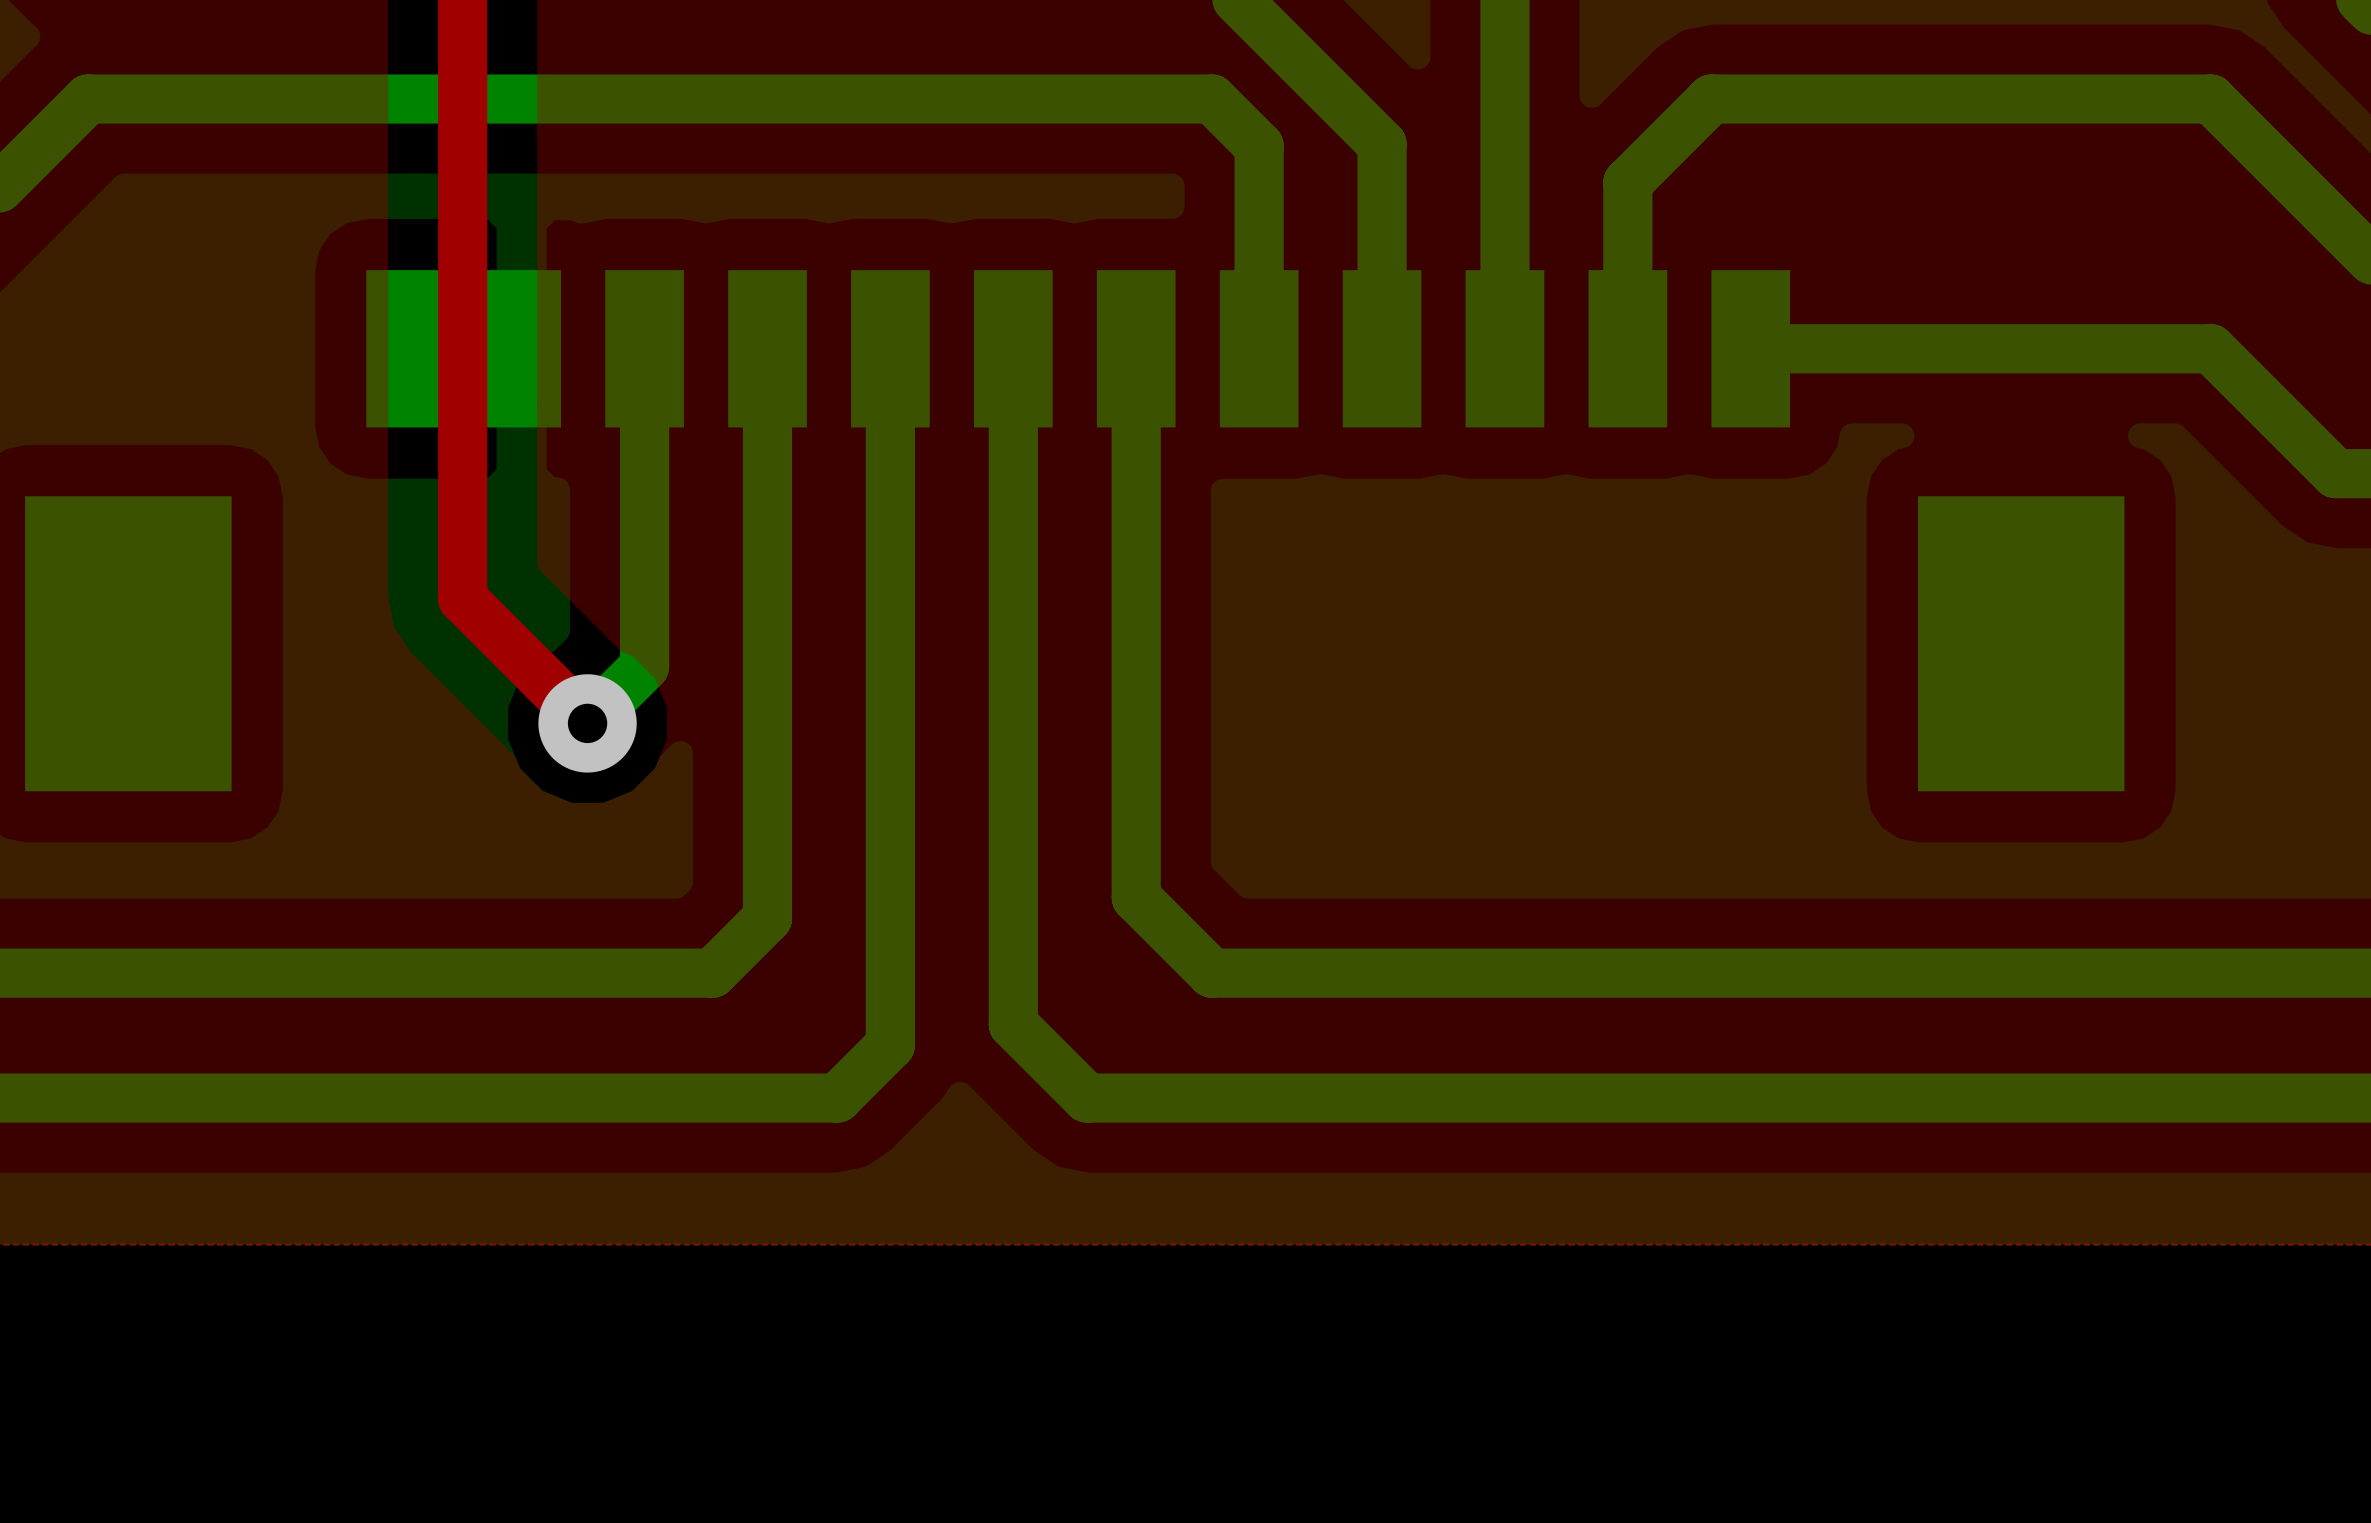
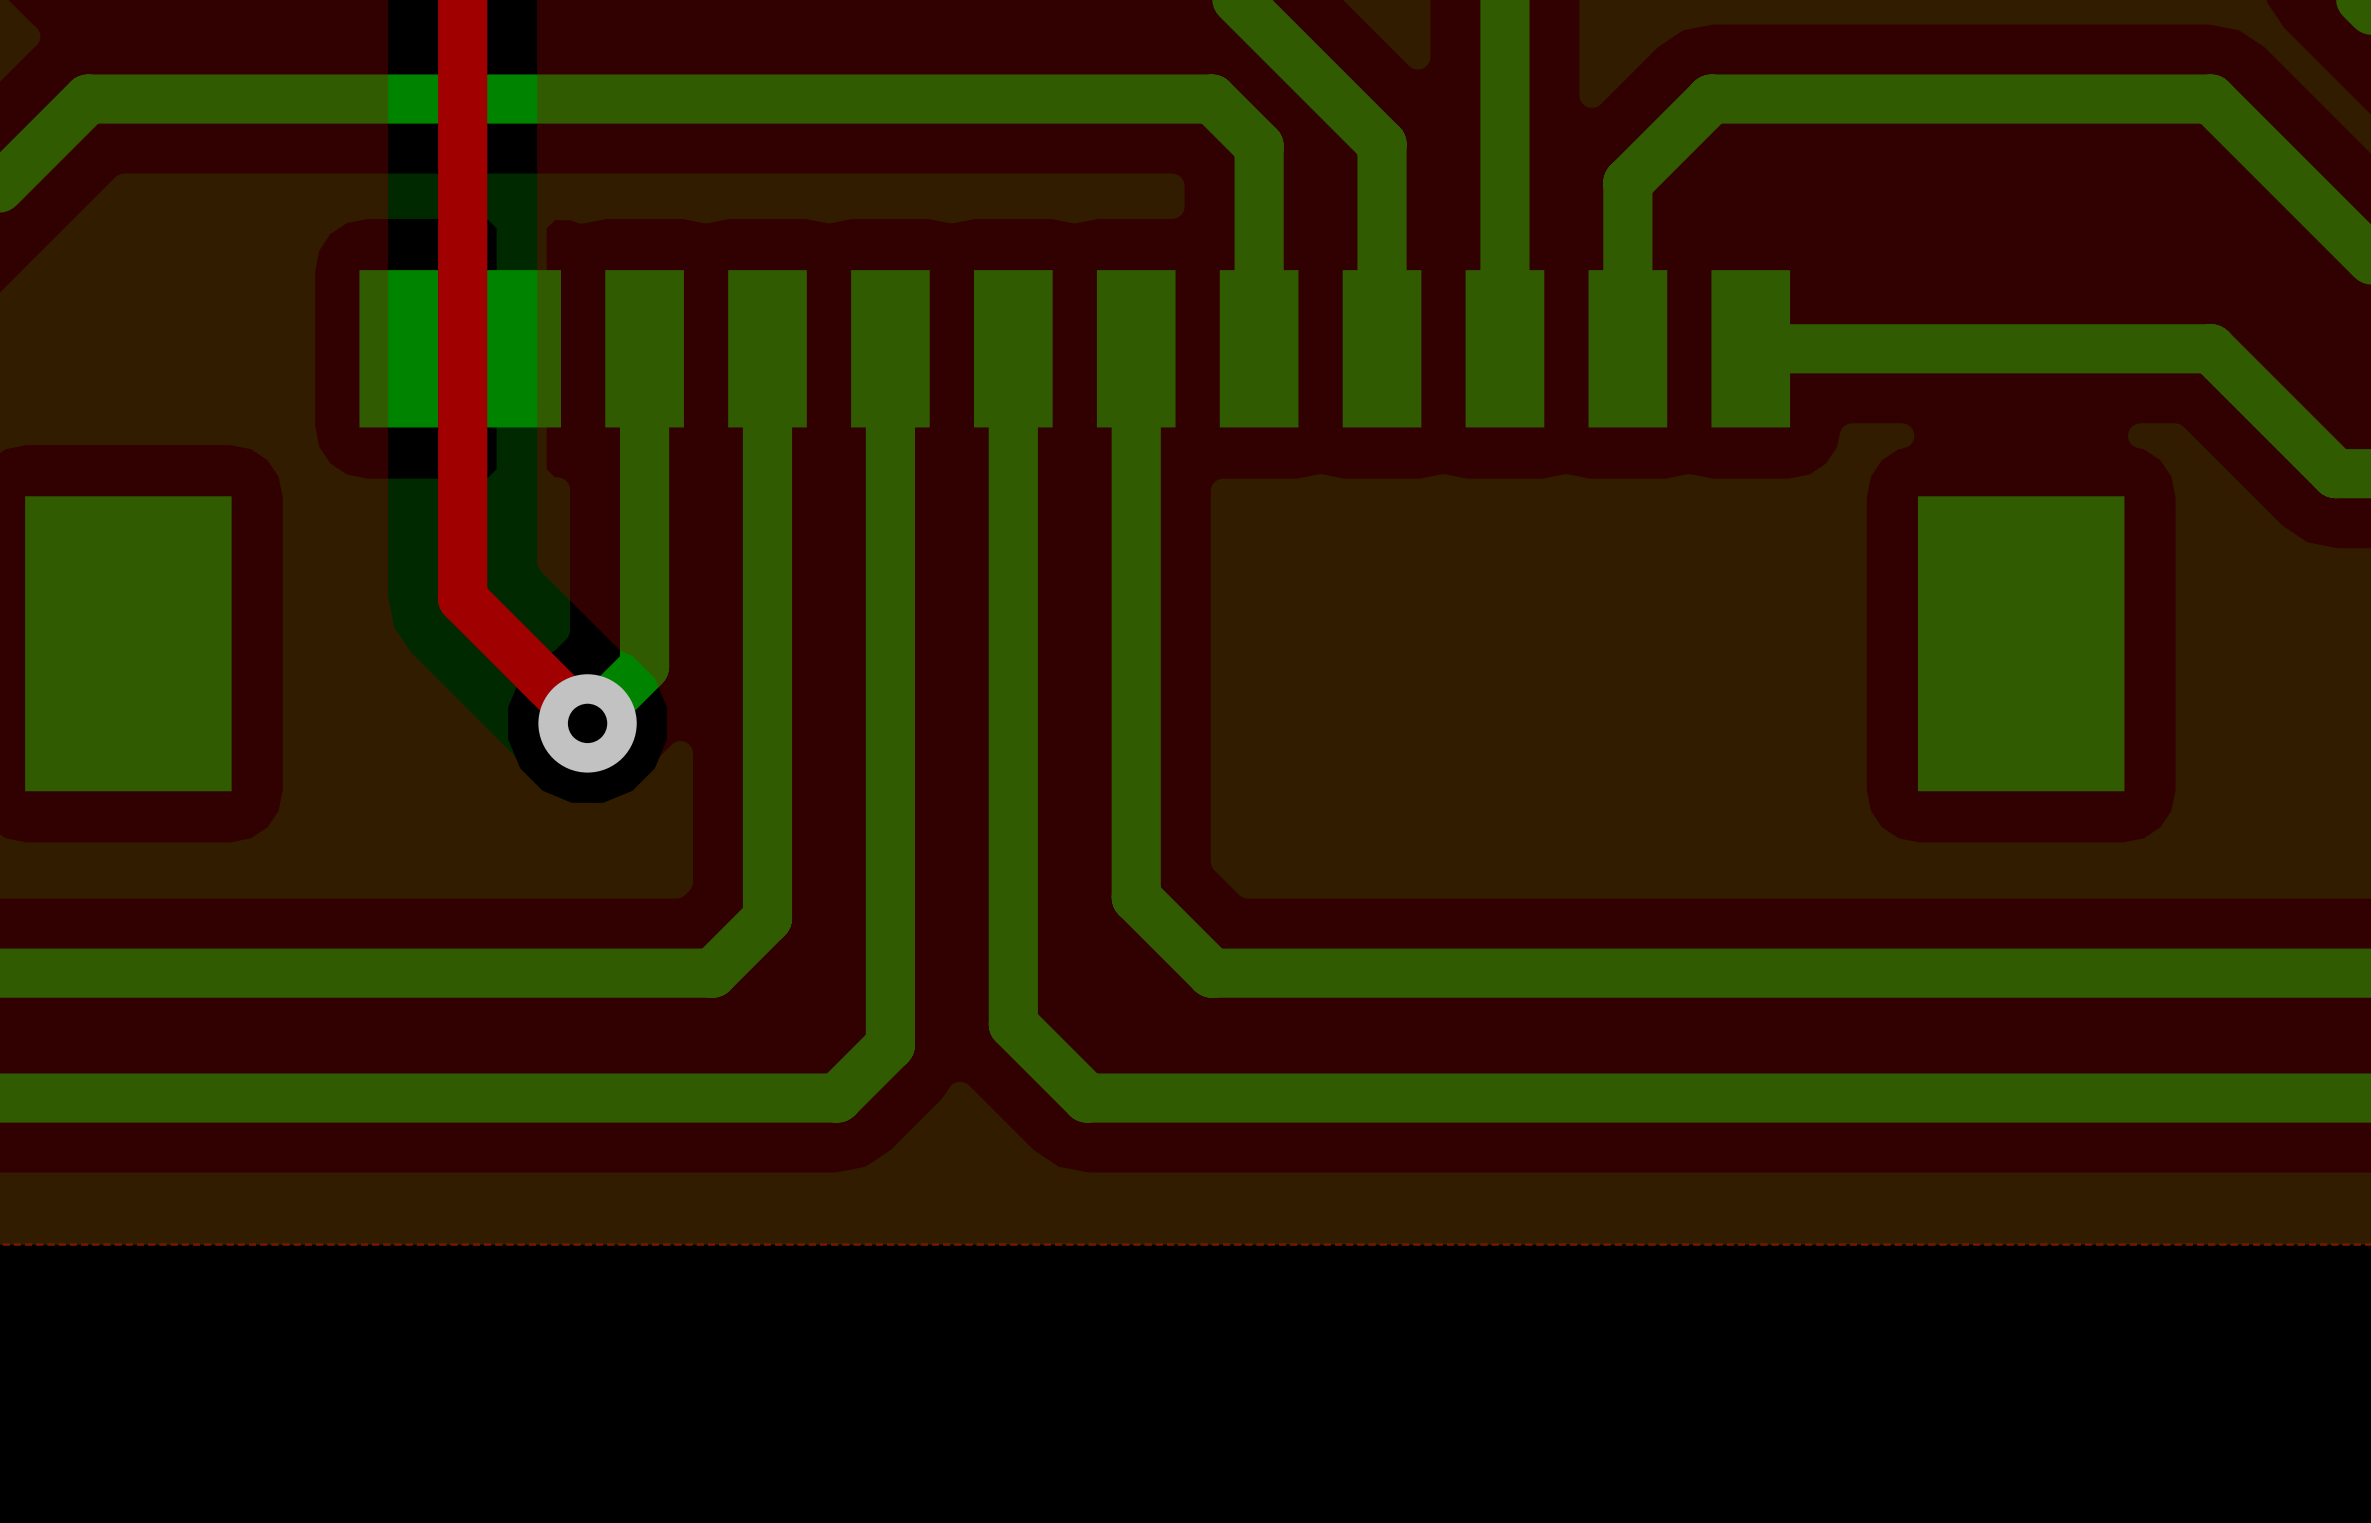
part footprint: [25, 270, 2125, 792] -> [25, 270, 2125, 792]

